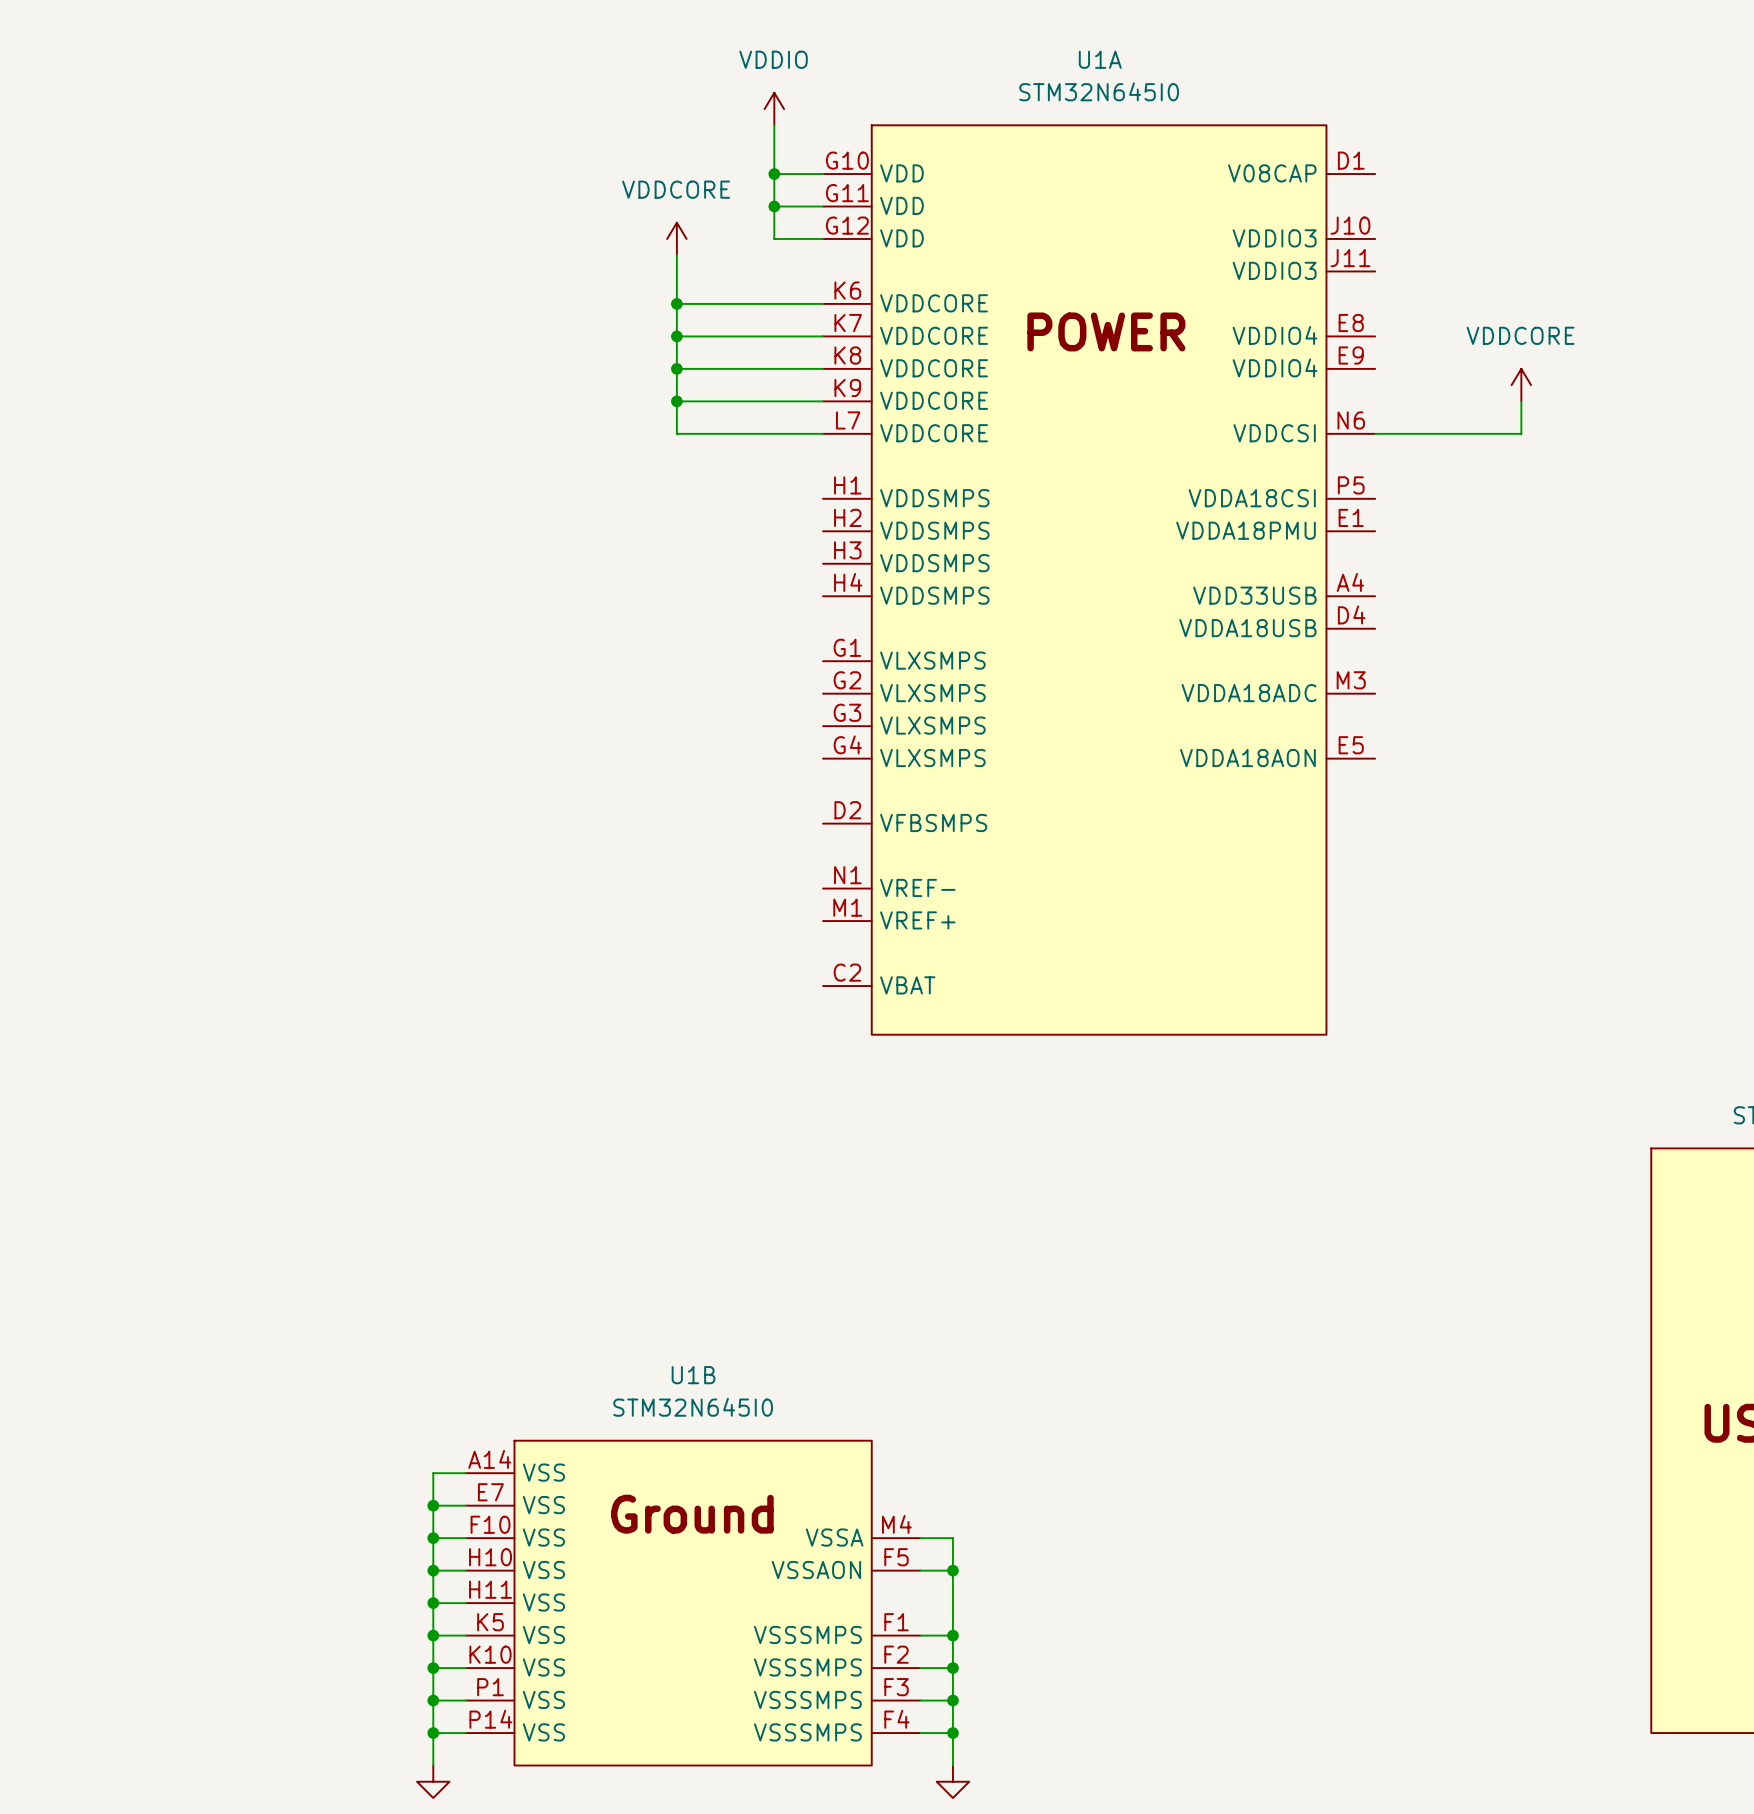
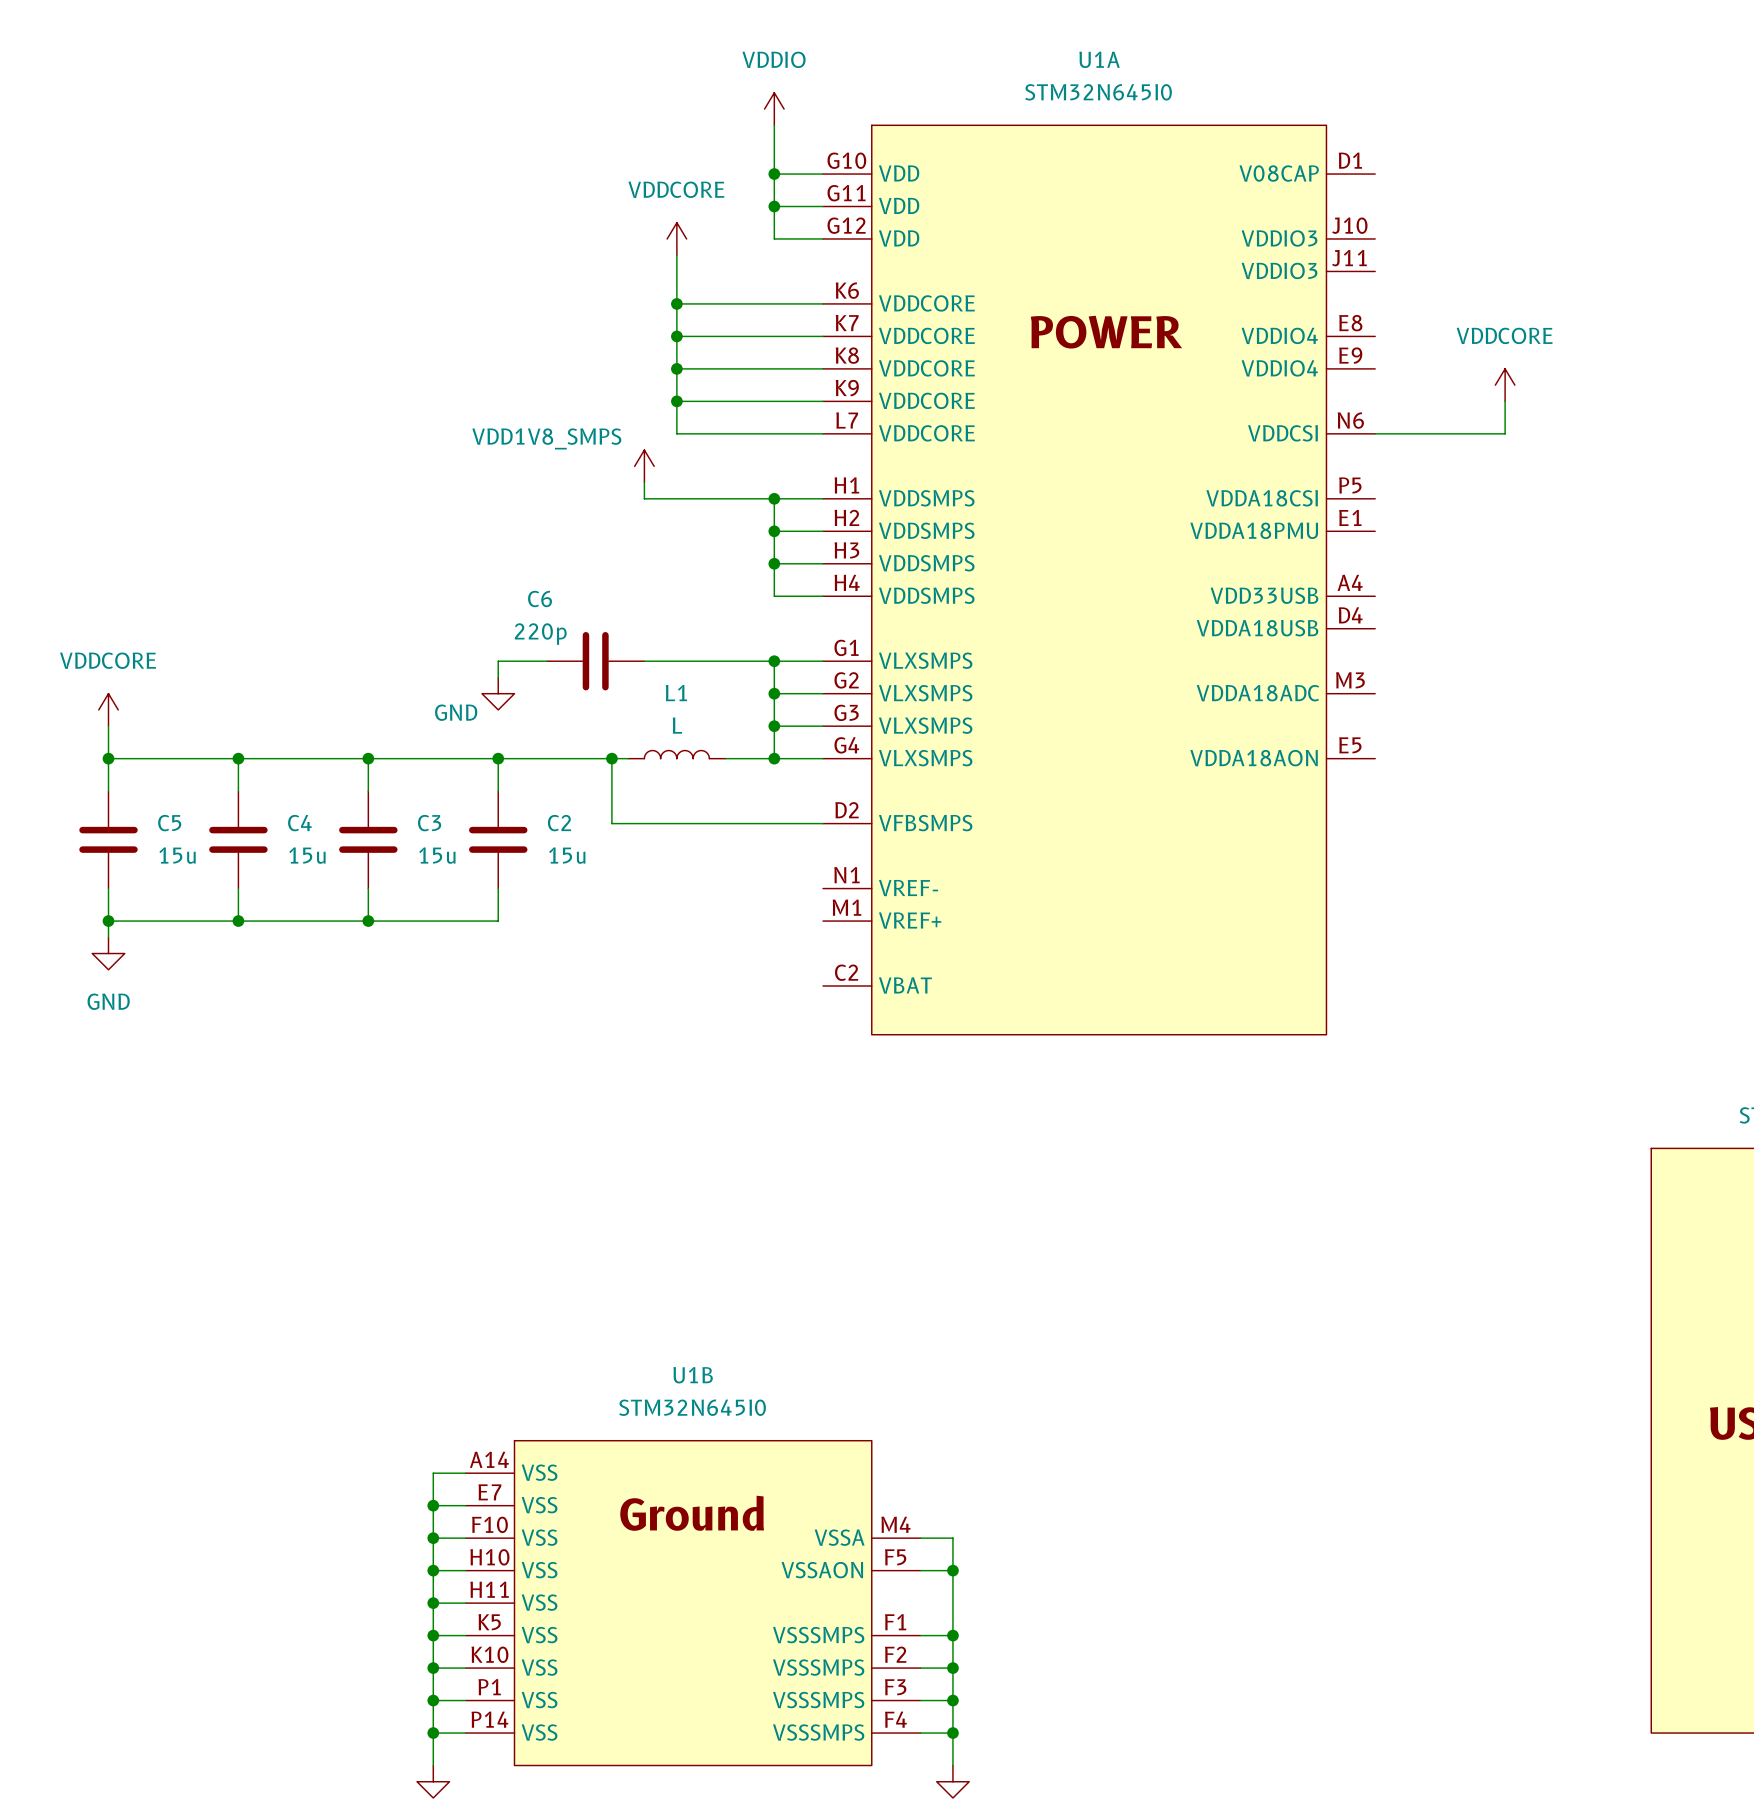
power symbol position: VDDCORE (1521, 385) -> VDDCORE (1505, 385)
wire: (1521, 401) (1521, 433) (1505, 433) -> (1505, 401) (1505, 433)
power symbol: none -> VDD1V8_SMPS (644, 466)
wire: none -> (644, 482) (644, 498) (823, 498)
wire: none -> (774, 498) (774, 596) (823, 596)
junction: none -> (774, 498)
wire: none -> (774, 531) (823, 531)
junction: none -> (774, 531)
wire: none -> (774, 563) (823, 563)
junction: none -> (774, 563)
wire: none -> (546, 661) (498, 661) (498, 677)
C6: none -> 220p (595, 661)
wire: none -> (644, 661) (823, 661)
wire: none -> (774, 661) (774, 758)
junction: none -> (774, 661)
power symbol: none -> GND (498, 693)
wire: none -> (774, 693) (823, 693)
junction: none -> (774, 693)
power symbol: none -> VDDCORE (108, 709)
wire: none -> (108, 726) (108, 791)
wire: none -> (774, 726) (823, 726)
junction: none -> (774, 726)
L1: none -> L (676, 754)
wire: none -> (108, 758) (628, 758)
junction: none -> (108, 758)
wire: none -> (238, 758) (238, 791)
junction: none -> (238, 758)
wire: none -> (368, 758) (368, 791)
junction: none -> (368, 758)
wire: none -> (498, 758) (498, 791)
junction: none -> (498, 758)
wire: none -> (611, 758) (611, 823) (823, 823)
junction: none -> (611, 758)
wire: none -> (725, 758) (823, 758)
junction: none -> (774, 758)
C5: none -> 15u (108, 839)
C4: none -> 15u (238, 839)
C3: none -> 15u (368, 839)
C2: none -> 15u (498, 839)
wire: none -> (108, 888) (108, 937)
wire: none -> (238, 888) (238, 921)
wire: none -> (368, 888) (368, 921)
wire: none -> (498, 888) (498, 921) (108, 921)
junction: none -> (108, 921)
junction: none -> (238, 921)
junction: none -> (368, 921)
power symbol: none -> GND (108, 953)

